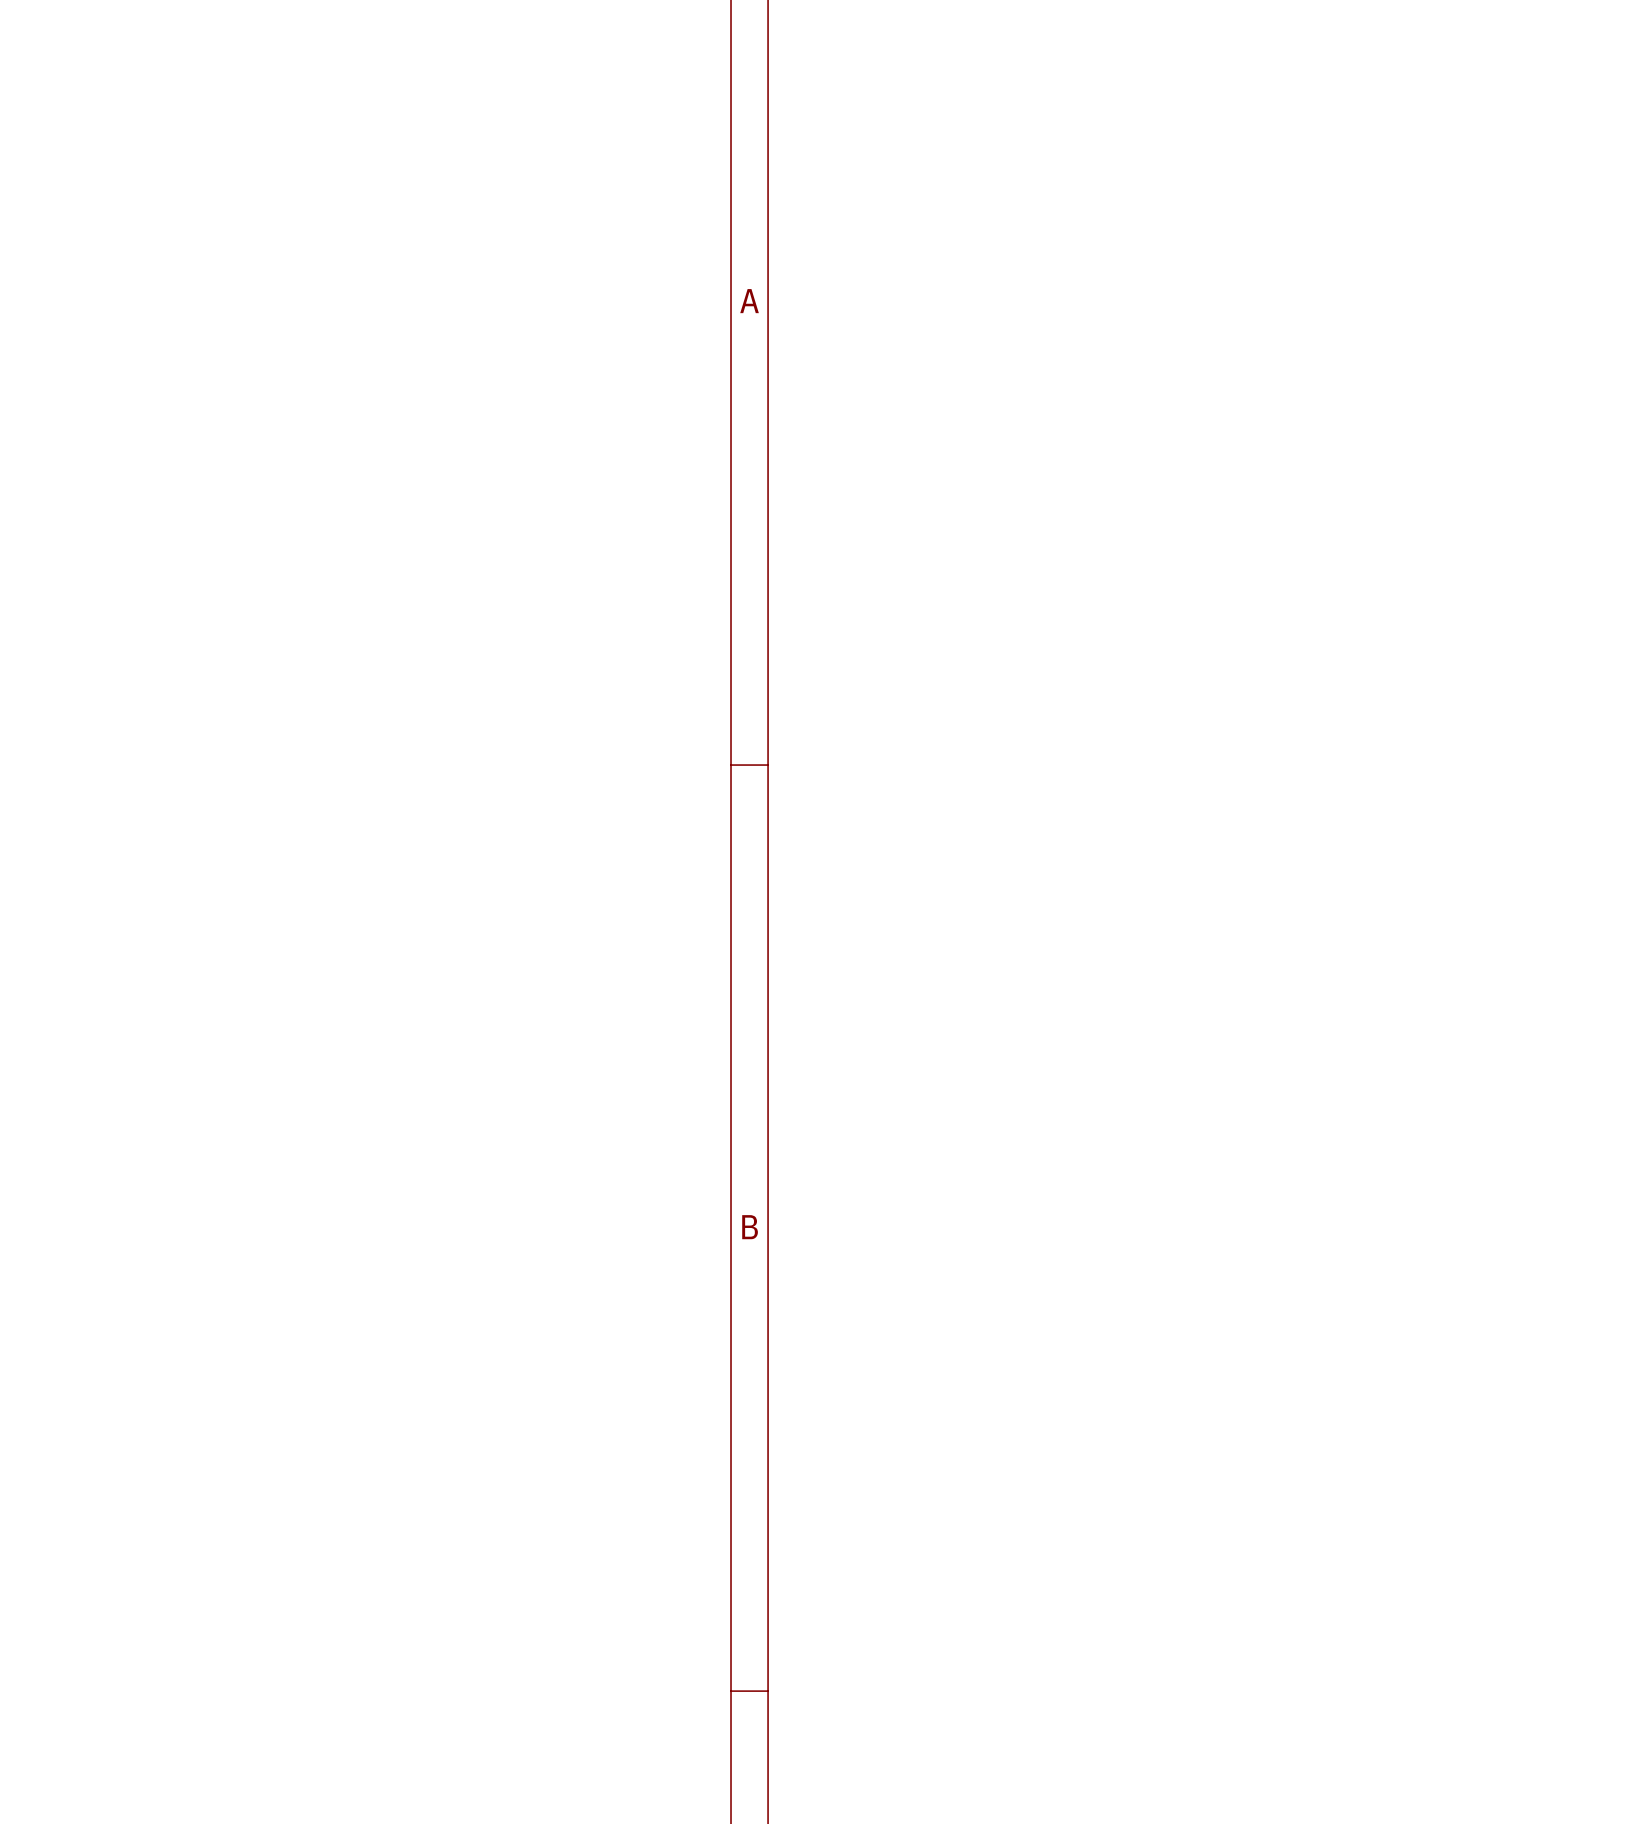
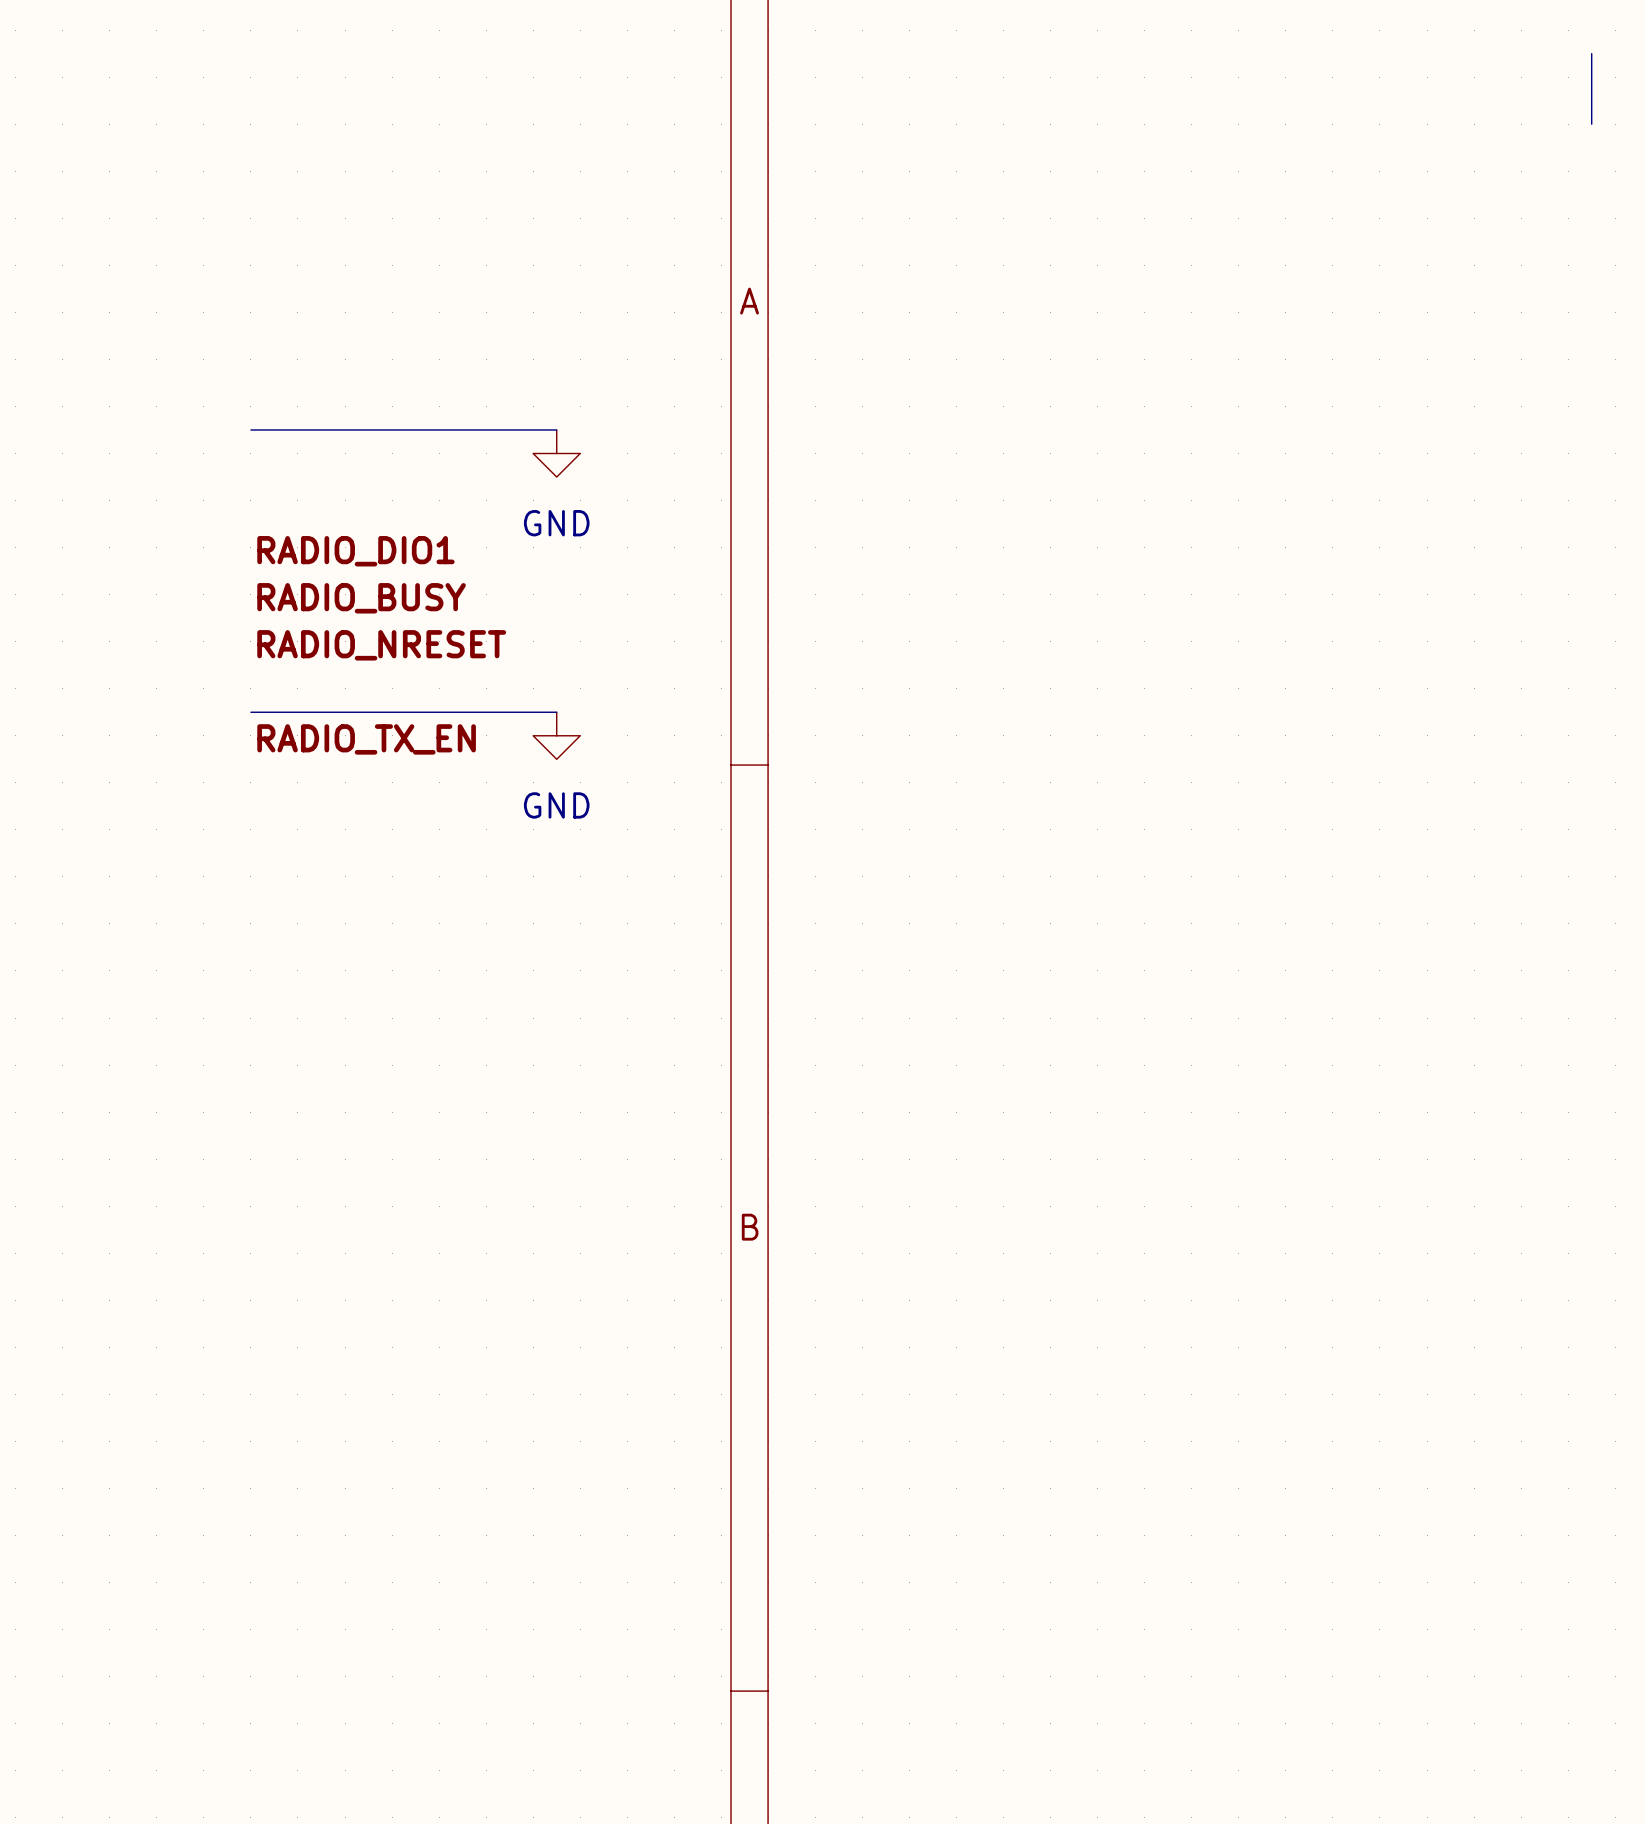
wire: none -> (1591, 53) (1591, 124)
wire: none -> (250, 429) (556, 429)
power symbol: none -> GND (556, 453)
label: none -> RADIO_DIO1 (355, 551)
label: none -> RADIO_BUSY (361, 598)
label: none -> RADIO_NRESET (381, 645)
wire: none -> (250, 712) (556, 712)
power symbol: none -> GND (556, 735)
label: none -> RADIO_TX_EN (366, 739)

